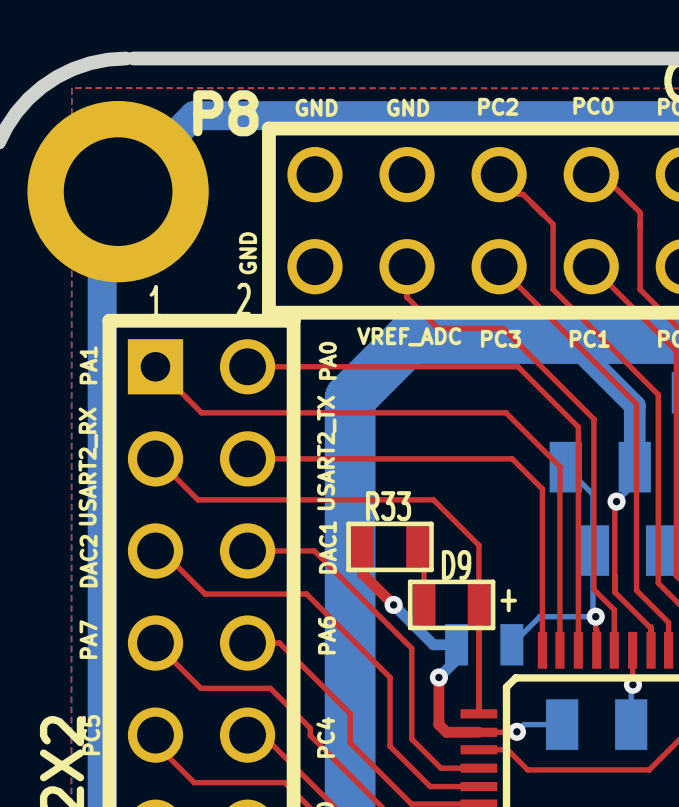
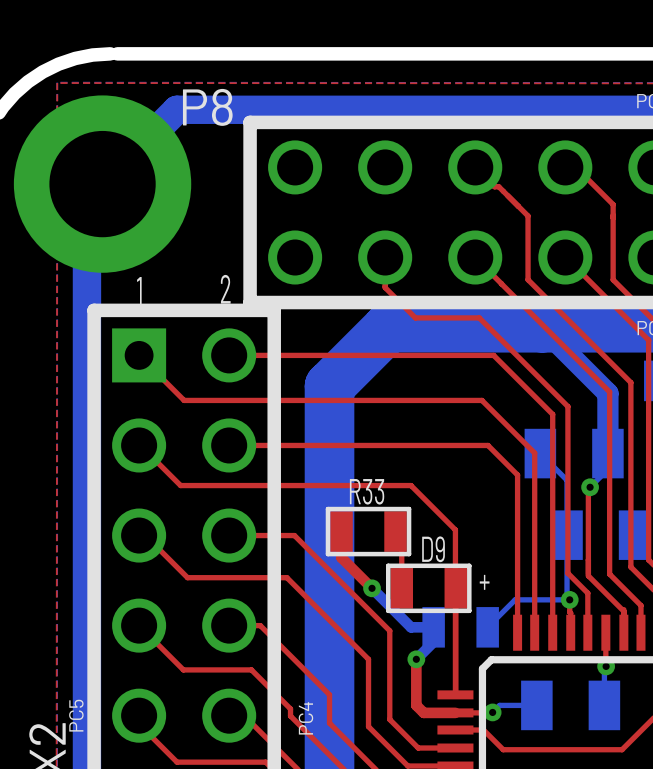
text: PC0 (593, 105) -> none
text: PC2 (498, 106) -> none
text: GND (316, 107) -> none
text: GND (408, 107) -> none
text: GND (248, 253) -> none
text: VREF_ADC (409, 336) -> none
text: PC3 (500, 338) -> none
text: PC1 (589, 338) -> none
text: PA0 (327, 360) -> none
text: PA1 (88, 365) -> none
text: USART2_TX (326, 452) -> none
text: USART2_RX (88, 466) -> none
text: DAC1 (327, 547) -> none
text: DAC2 (88, 561) -> none
text: PA6 (326, 635) -> none
text: PA7 (88, 639) -> none

